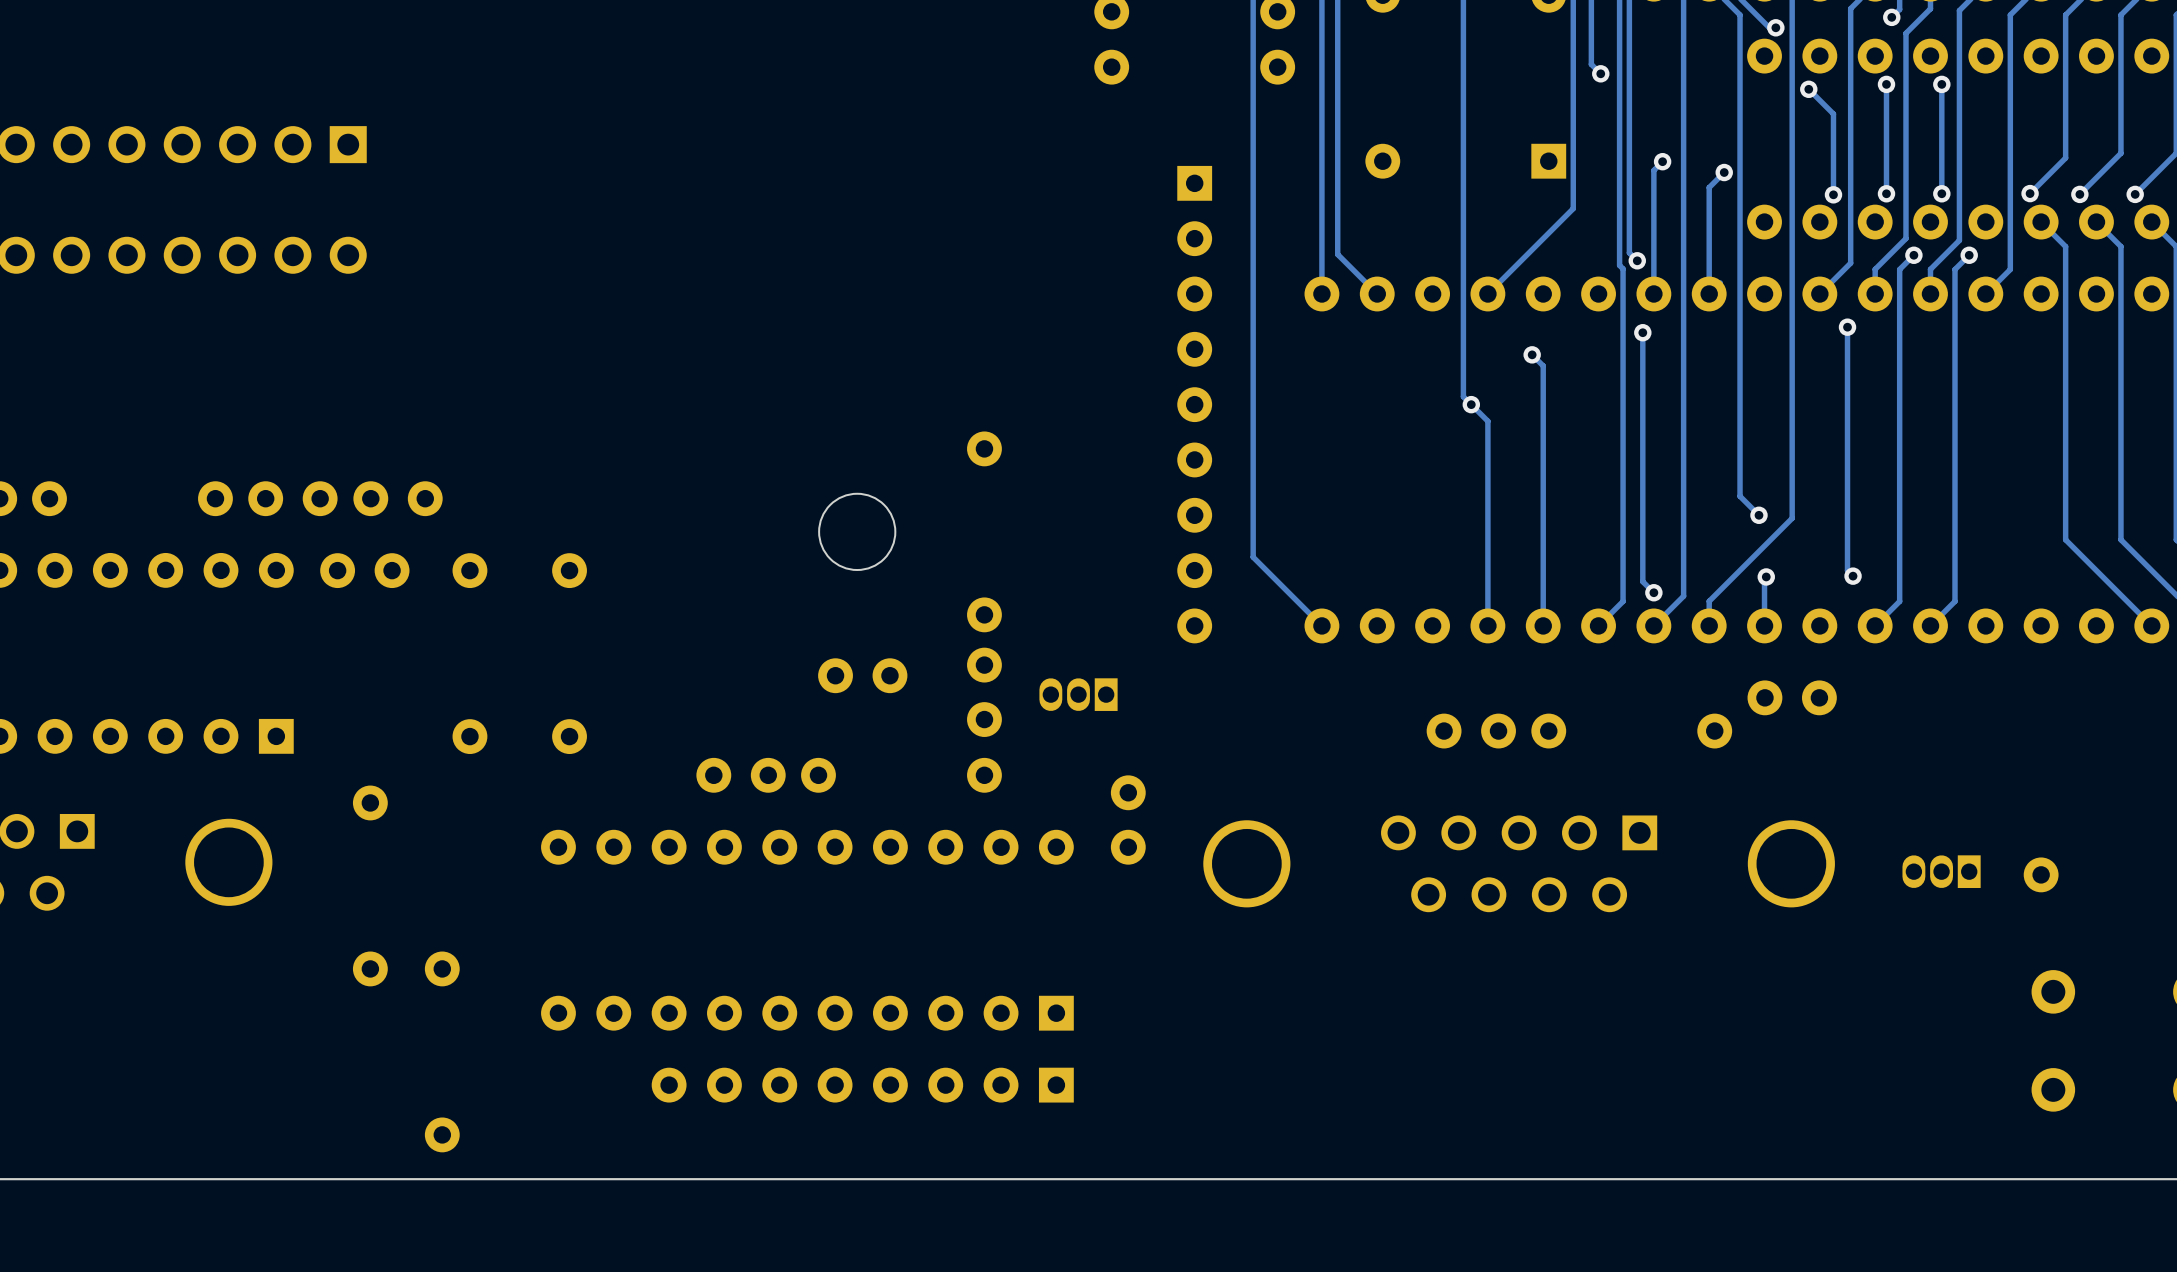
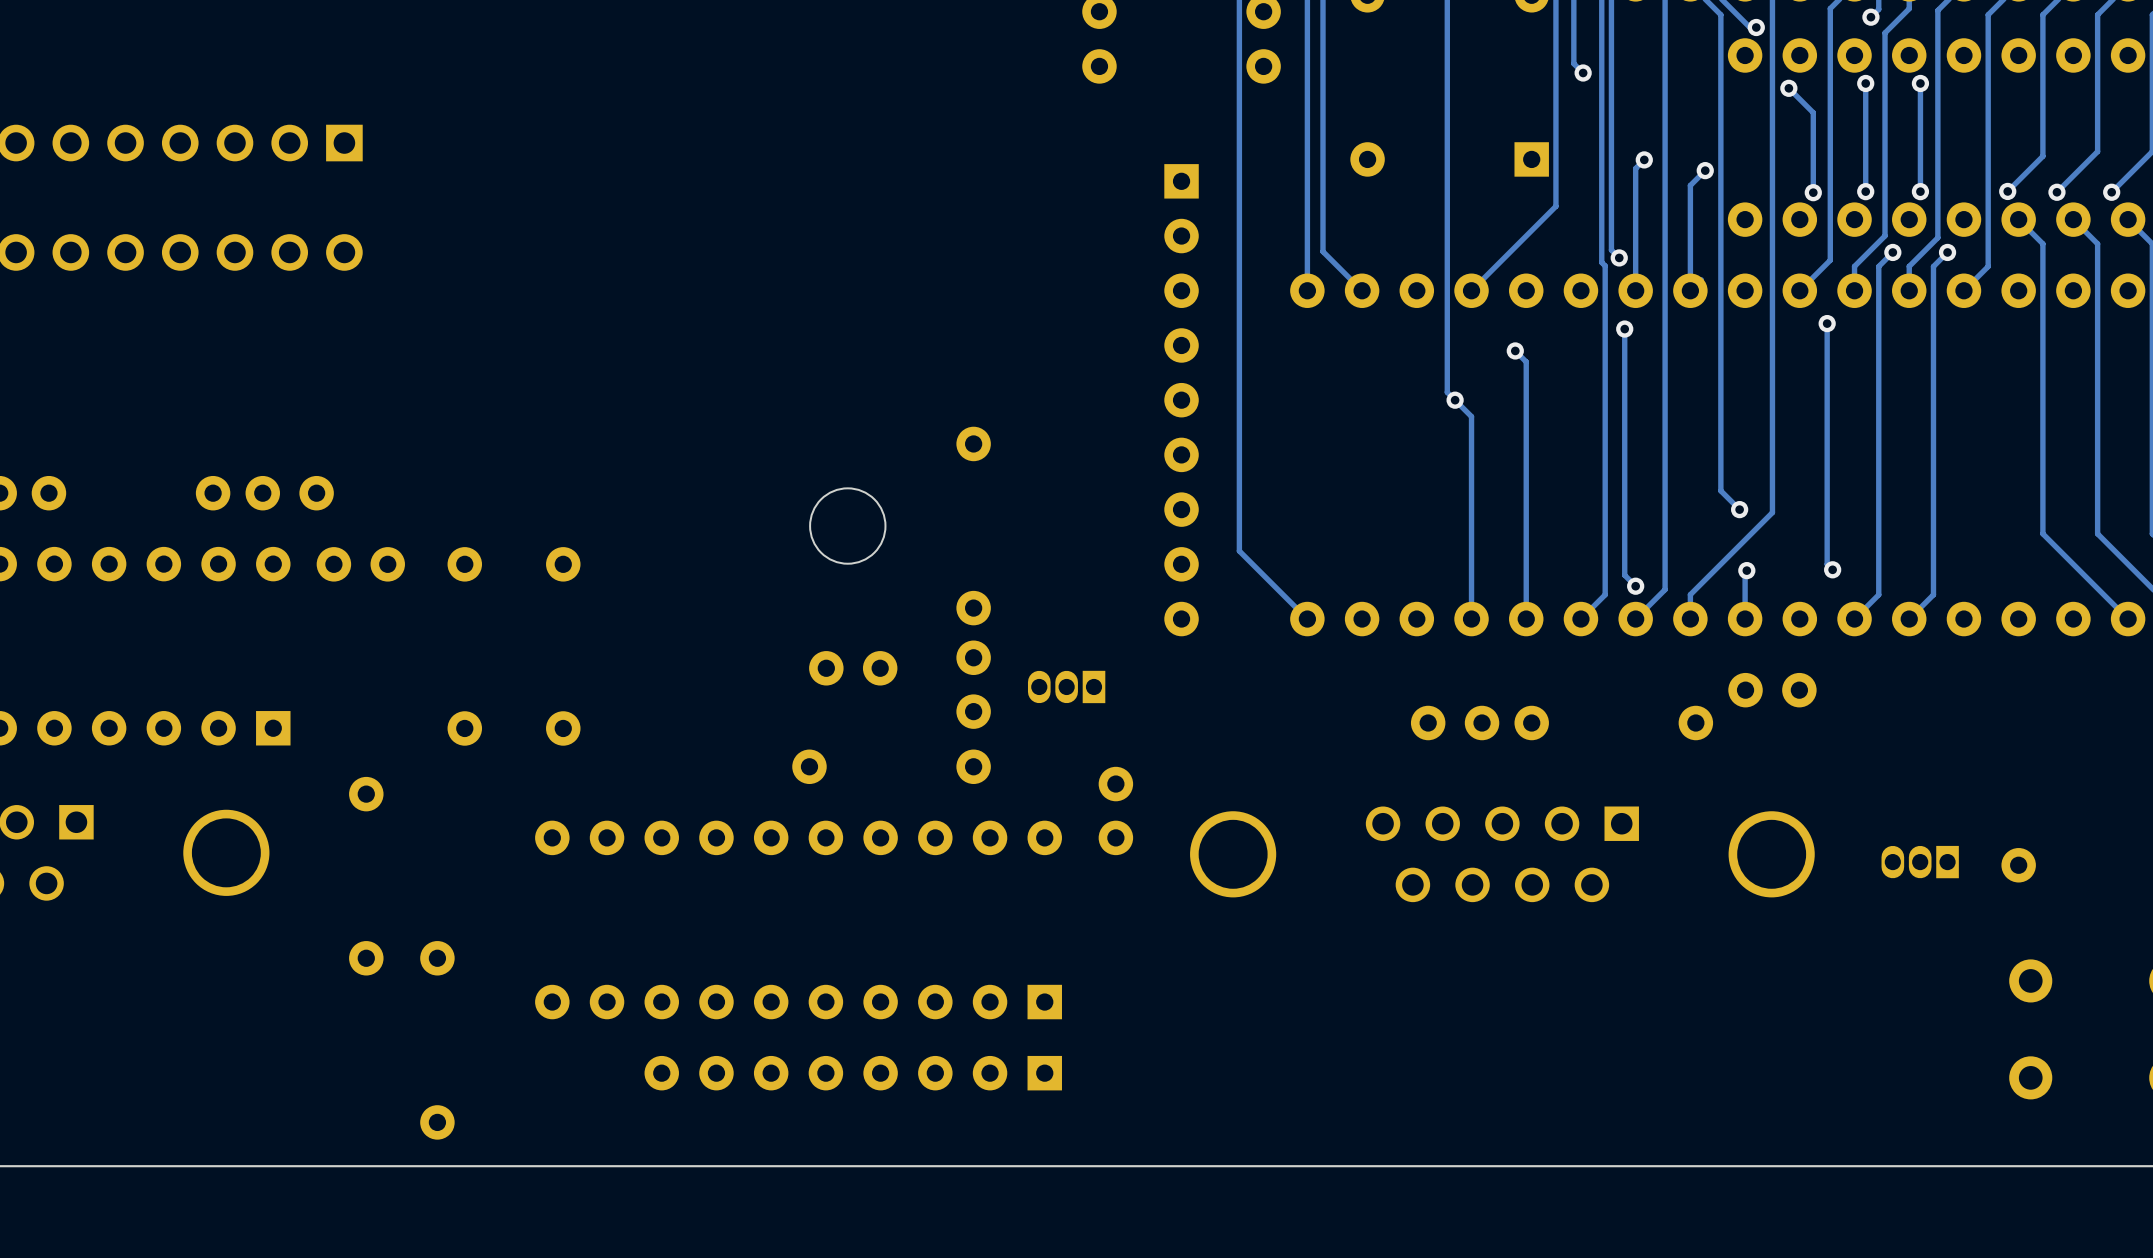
part: (398, 498) -> none
part: (741, 775) -> none

